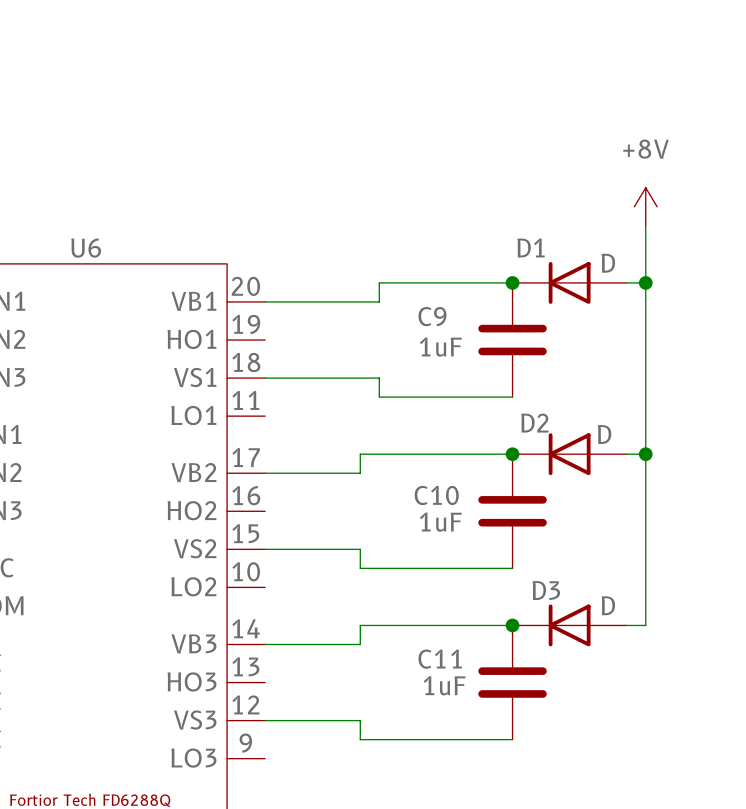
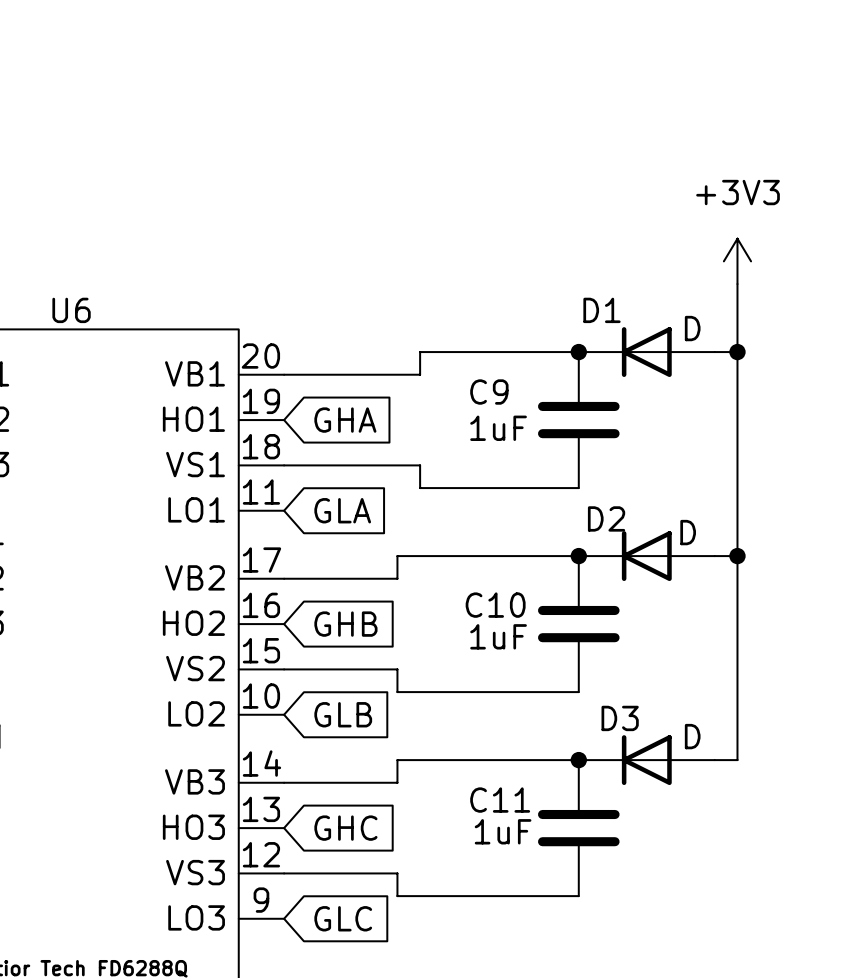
power symbol: +8V (645, 206) -> +3V3 (737, 261)
global label: none -> GHA (345, 420)
global label: none -> GLA (342, 510)
global label: none -> GHB (345, 624)
global label: none -> GLB (343, 714)
global label: none -> GHC (345, 828)
global label: none -> GLC (343, 918)

